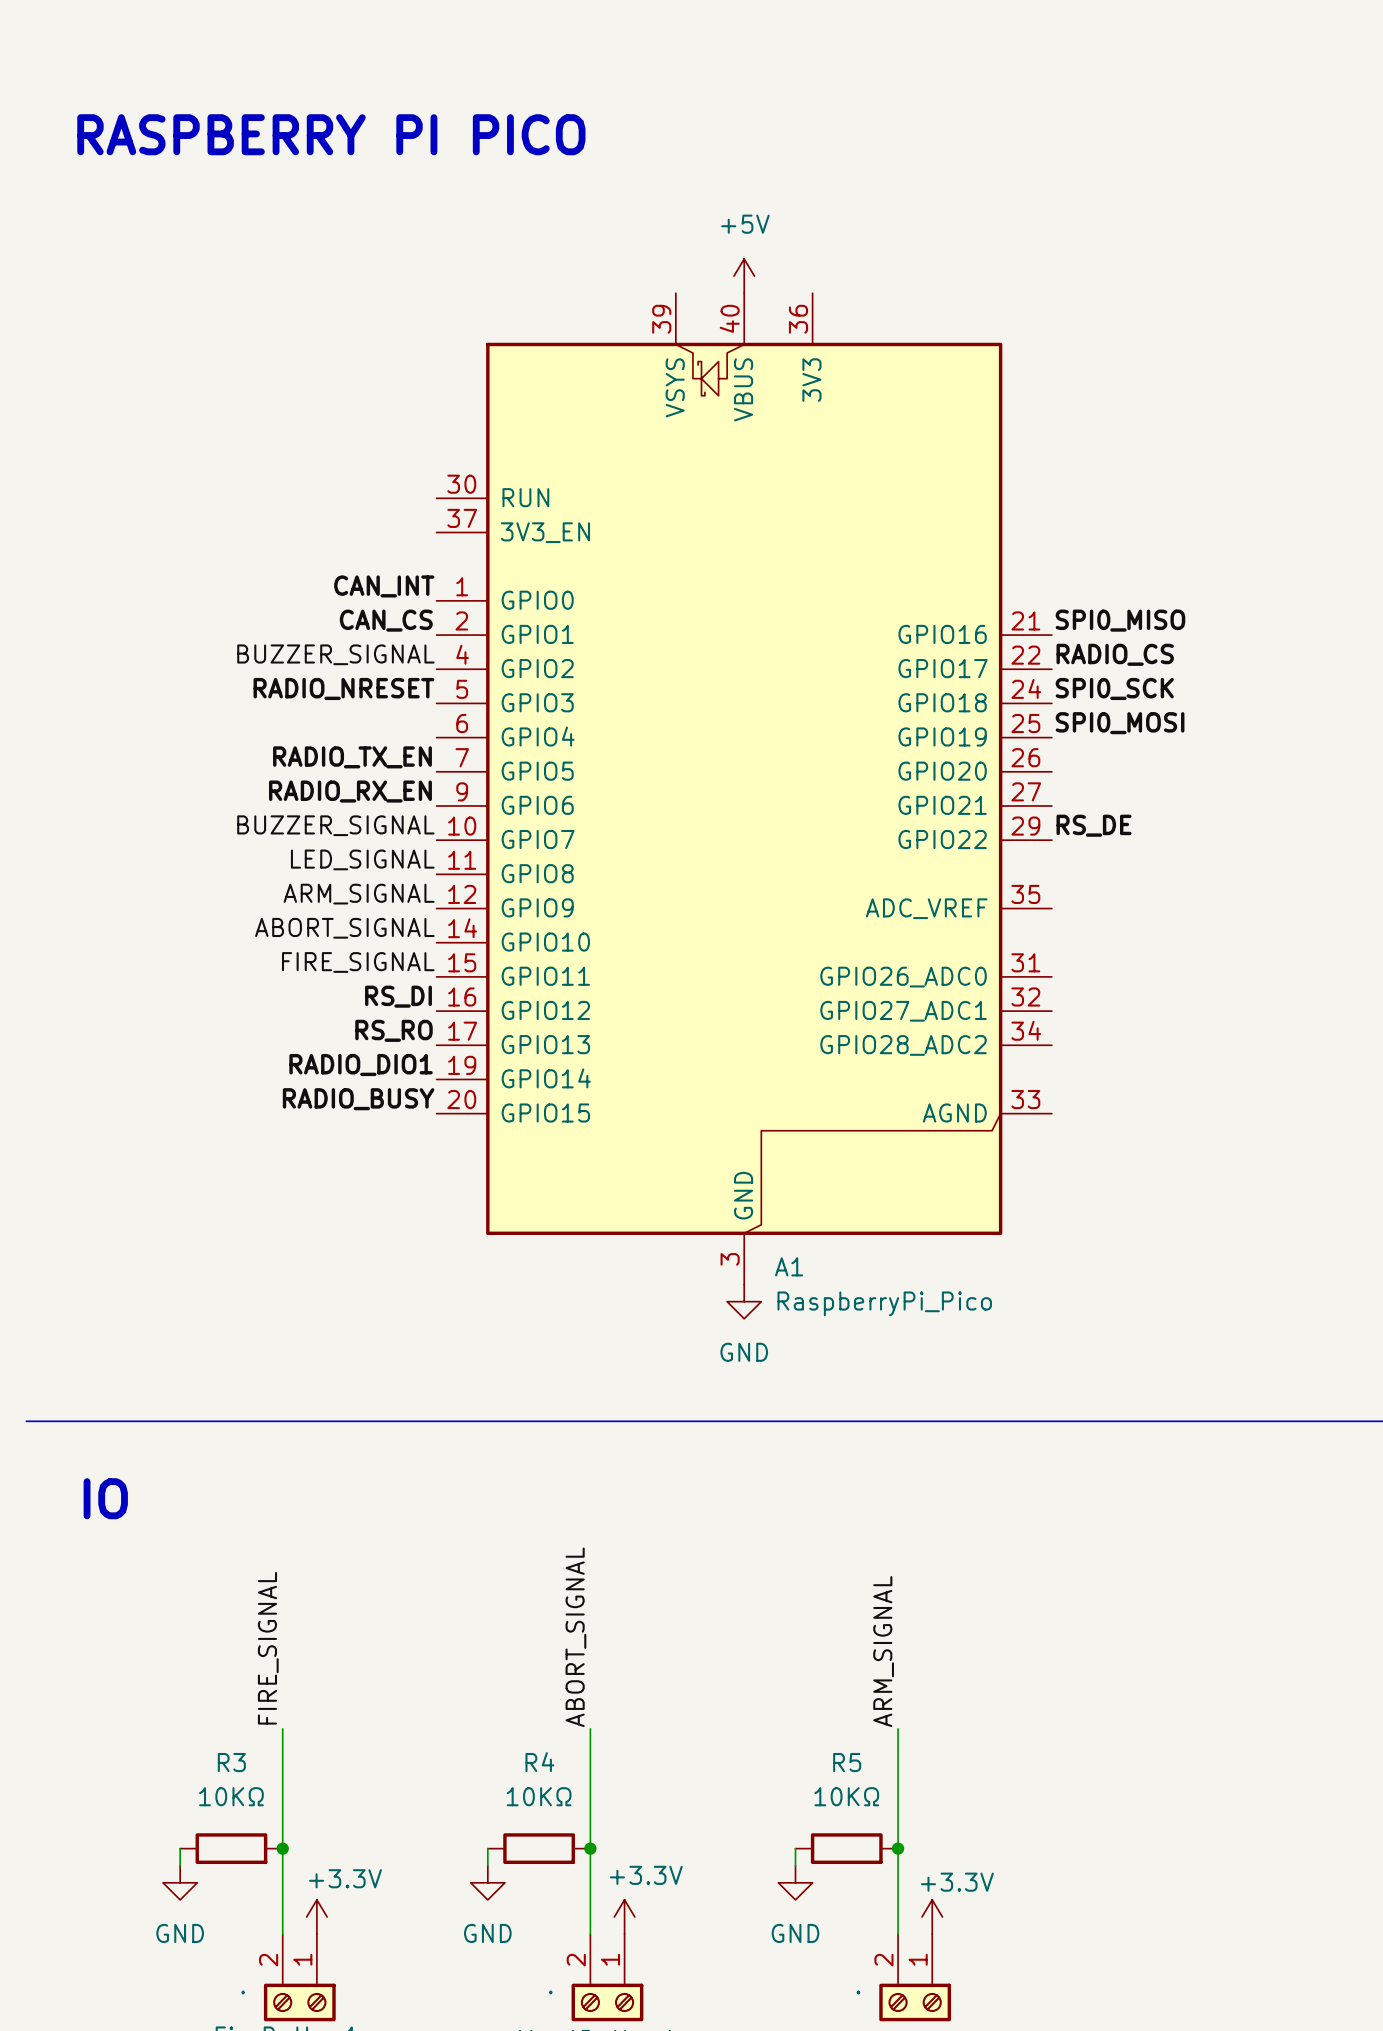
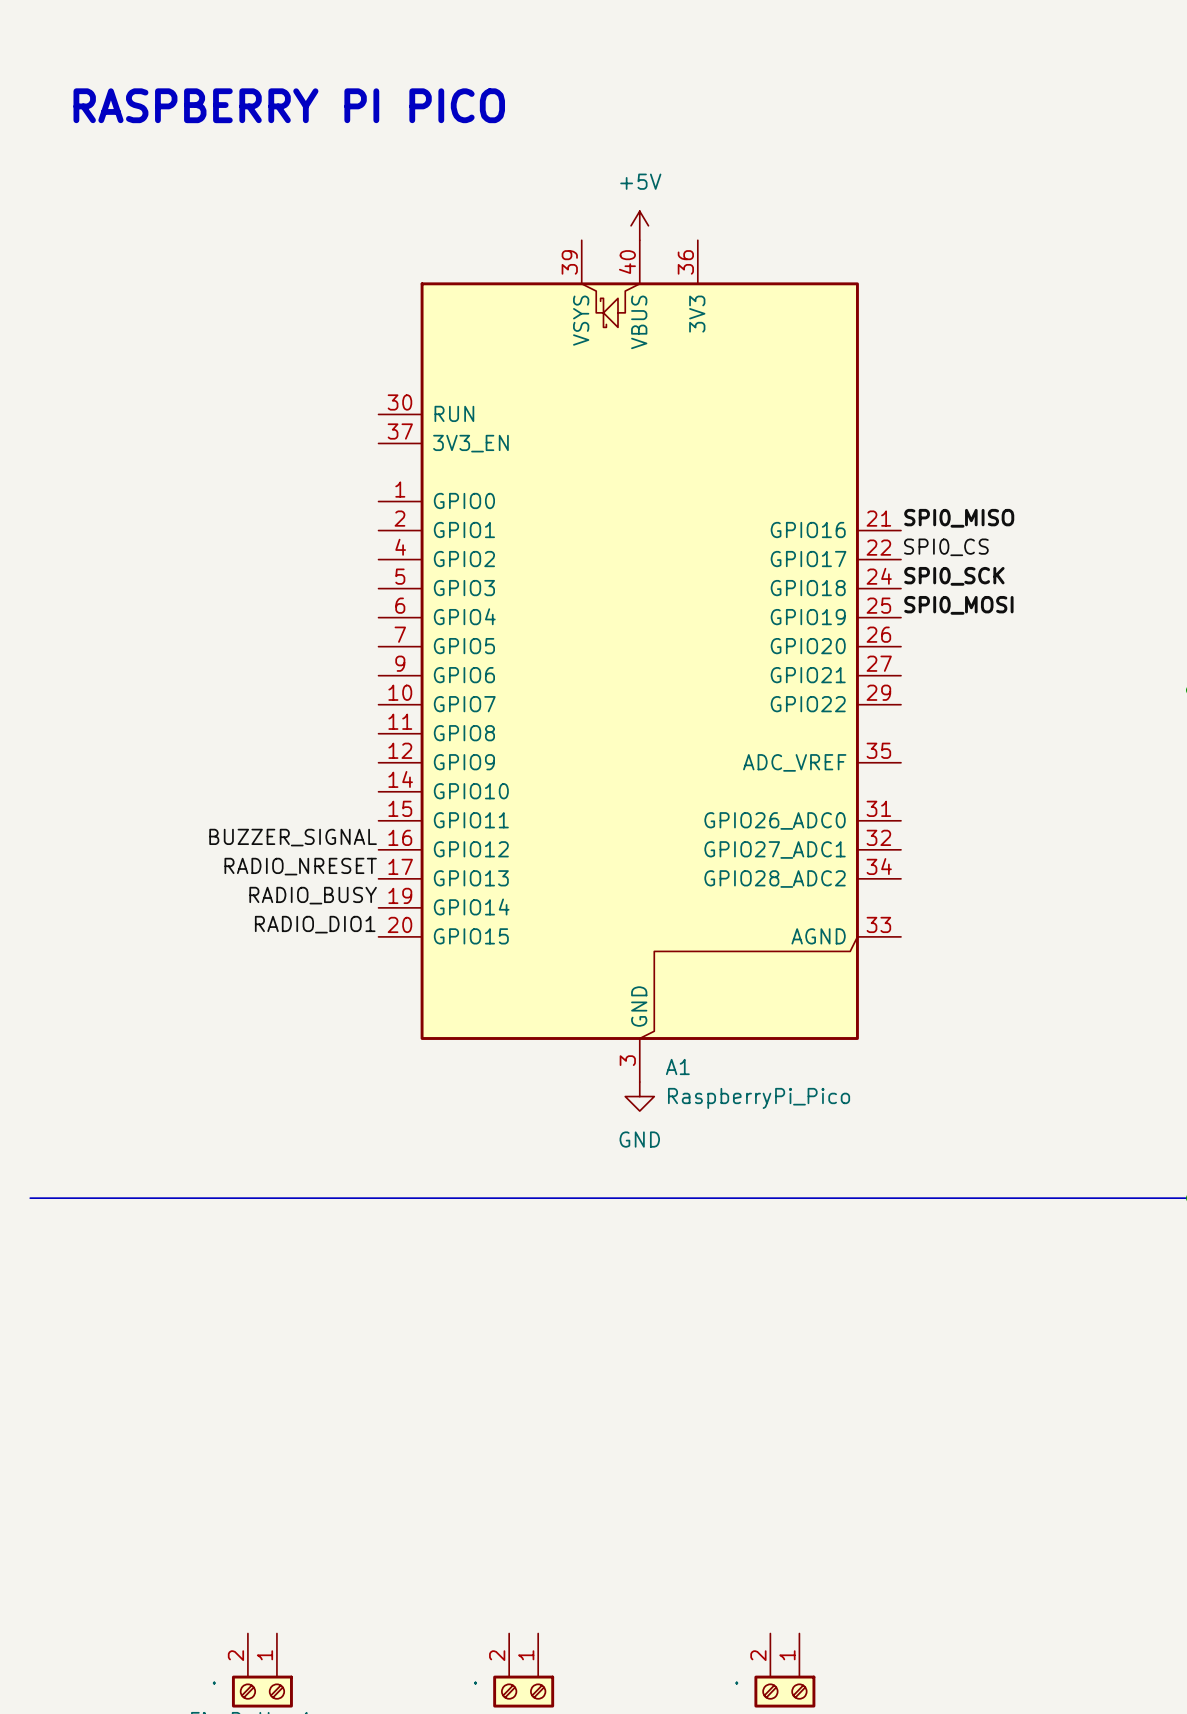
label: CAN_INT (384, 586) -> none
label: CAN_CS (386, 620) -> none
label: BUZZER_SIGNAL (335, 654) -> none
label: RADIO_CS (1115, 654) -> SPI0_CS (946, 547)
label: RADIO_NRESET (343, 688) -> none
label: RADIO_TX_EN (352, 757) -> none
label: RADIO_RX_EN (350, 791) -> none
label: BUZZER_SIGNAL (335, 825) -> none
label: RS_DE (1094, 825) -> none
label: LED_SIGNAL (362, 859) -> none
label: ARM_SIGNAL (359, 894) -> none
label: ABORT_SIGNAL (344, 928) -> none
label: FIRE_SIGNAL (358, 962) -> none
label: RS_DI (398, 996) -> BUZZER_SIGNAL (293, 837)
label: RS_RO (394, 1030) -> RADIO_NRESET (300, 866)
label: RADIO_DIO1 (361, 1065) -> RADIO_BUSY (313, 895)
label: RADIO_BUSY (358, 1099) -> RADIO_DIO1 (315, 924)
text: IO (105, 1498) -> none
label: ABORT_SIGNAL (575, 1637) -> none
label: FIRE_SIGNAL (268, 1648) -> none
label: ARM_SIGNAL (883, 1651) -> none
wire: (282, 1728) (282, 1934) -> none
wire: (590, 1728) (590, 1934) -> none
wire: (898, 1728) (898, 1934) -> none
wire: (180, 1848) (180, 1865) -> none
R3: 10KΩ (231, 1848) -> none
junction: (282, 1848) -> none
wire: (487, 1848) (487, 1865) -> none
R4: 10KΩ (539, 1848) -> none
junction: (590, 1848) -> none
wire: (795, 1848) (795, 1865) -> none
R5: 10KΩ (846, 1848) -> none
junction: (898, 1848) -> none
power symbol: GND (180, 1882) -> none
power symbol: GND (487, 1882) -> none
power symbol: GND (795, 1882) -> none
power symbol: +3.3V (316, 1917) -> none
power symbol: +3.3V (624, 1917) -> none
power symbol: +3.3V (932, 1917) -> none

